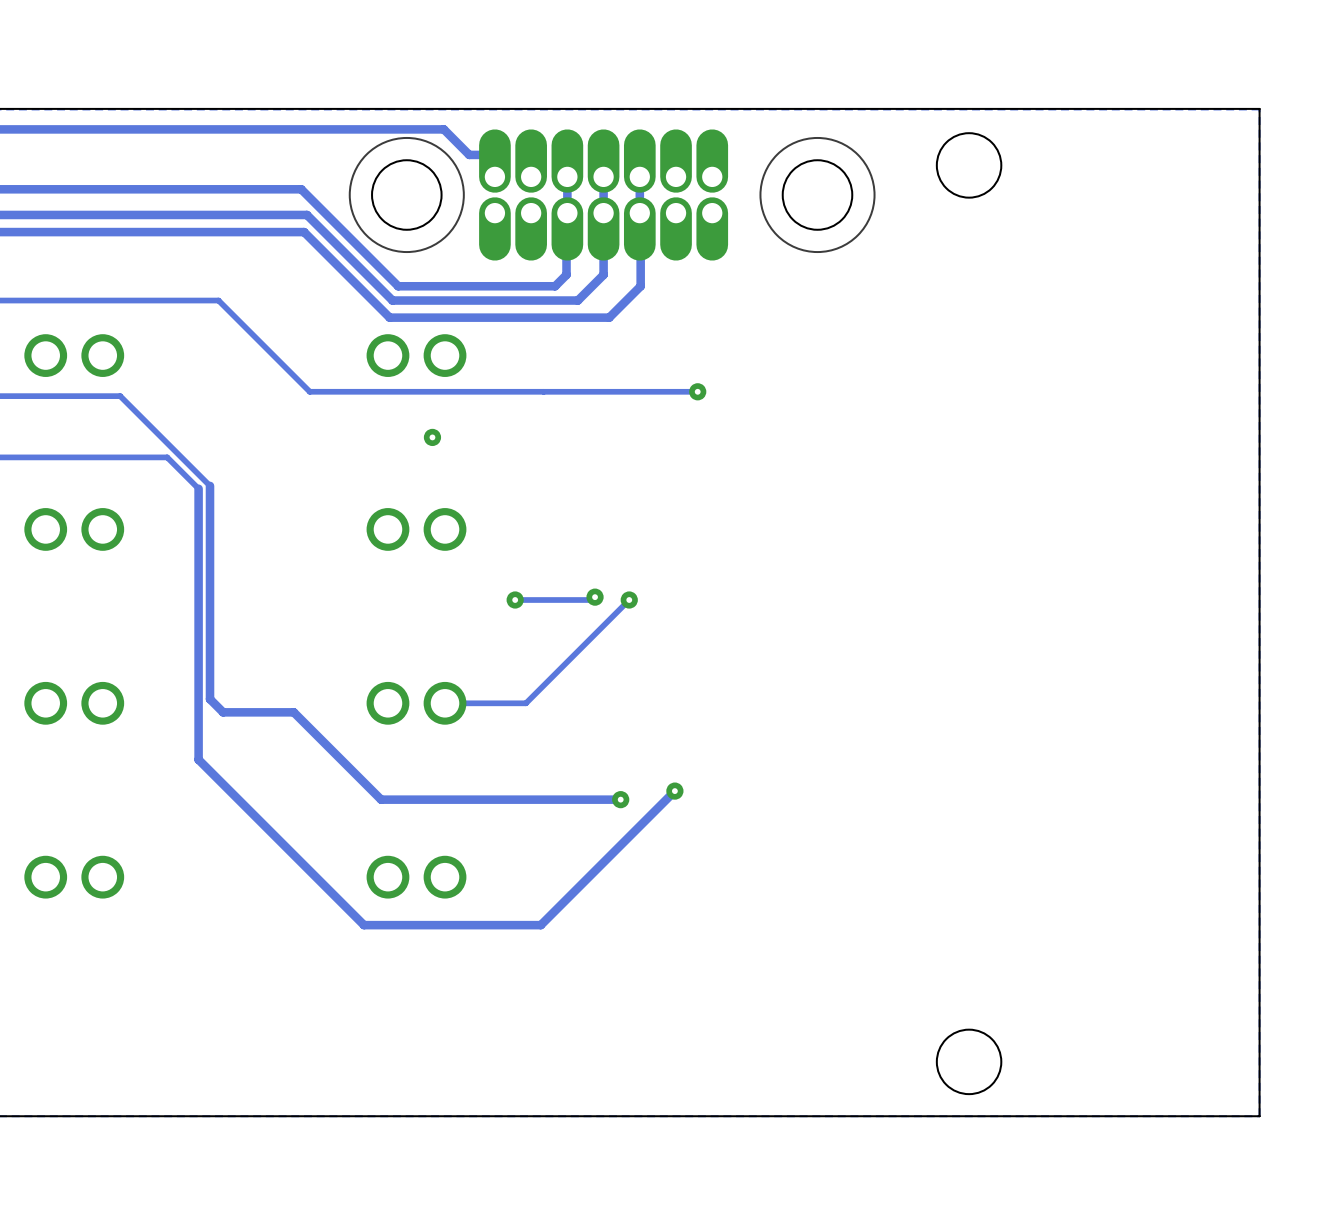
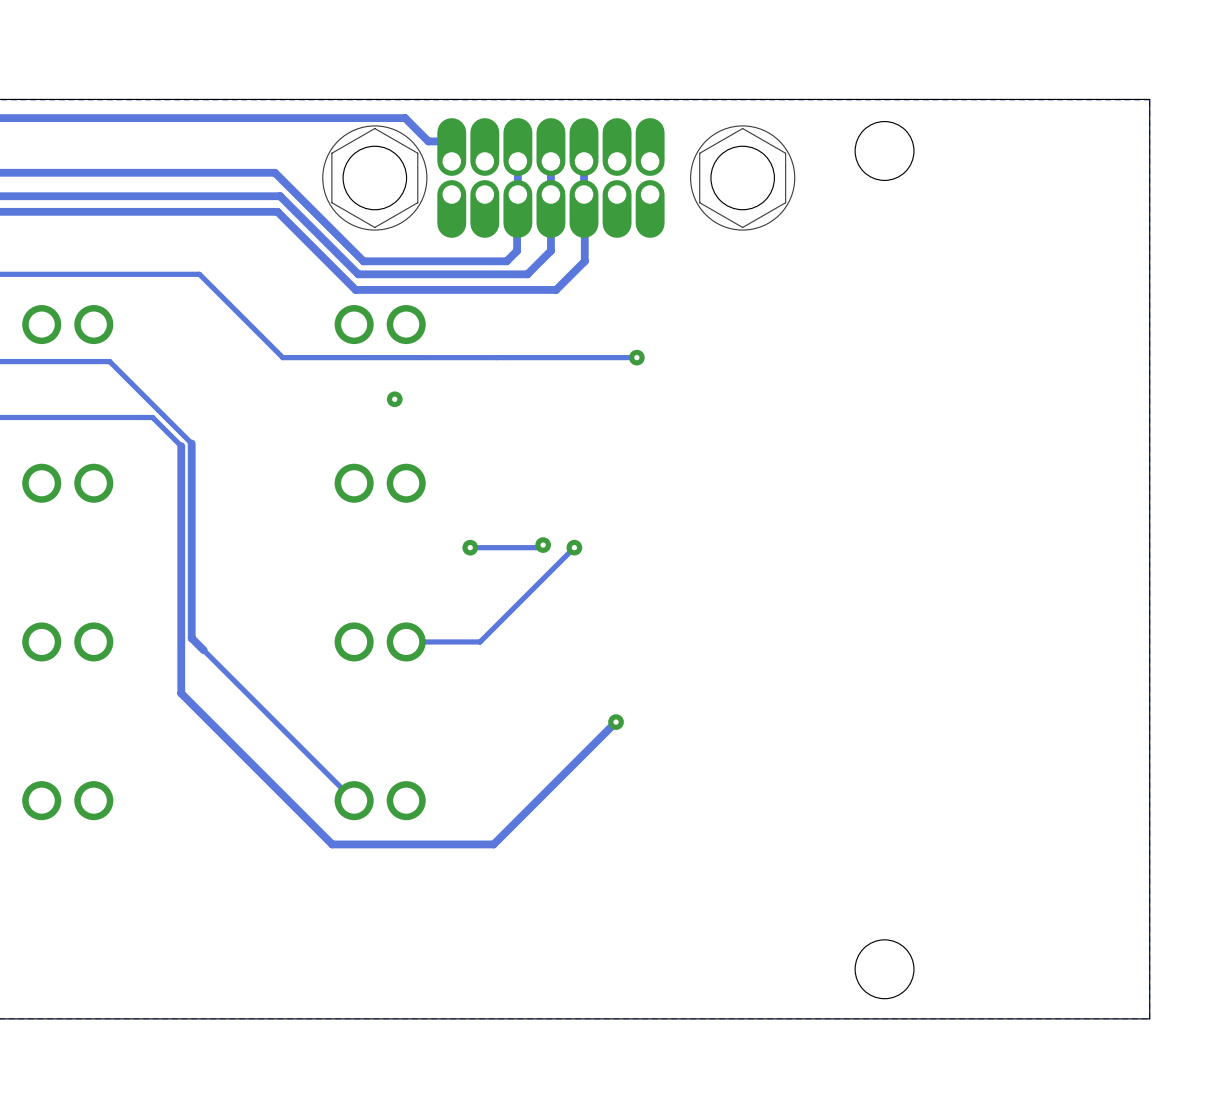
part footprint: [349, 129, 875, 261] -> [322, 118, 795, 238]
track: (223, 712) (293, 712) (381, 799) (620, 799) -> (203, 650) (354, 800)
via: (620, 799) -> none

